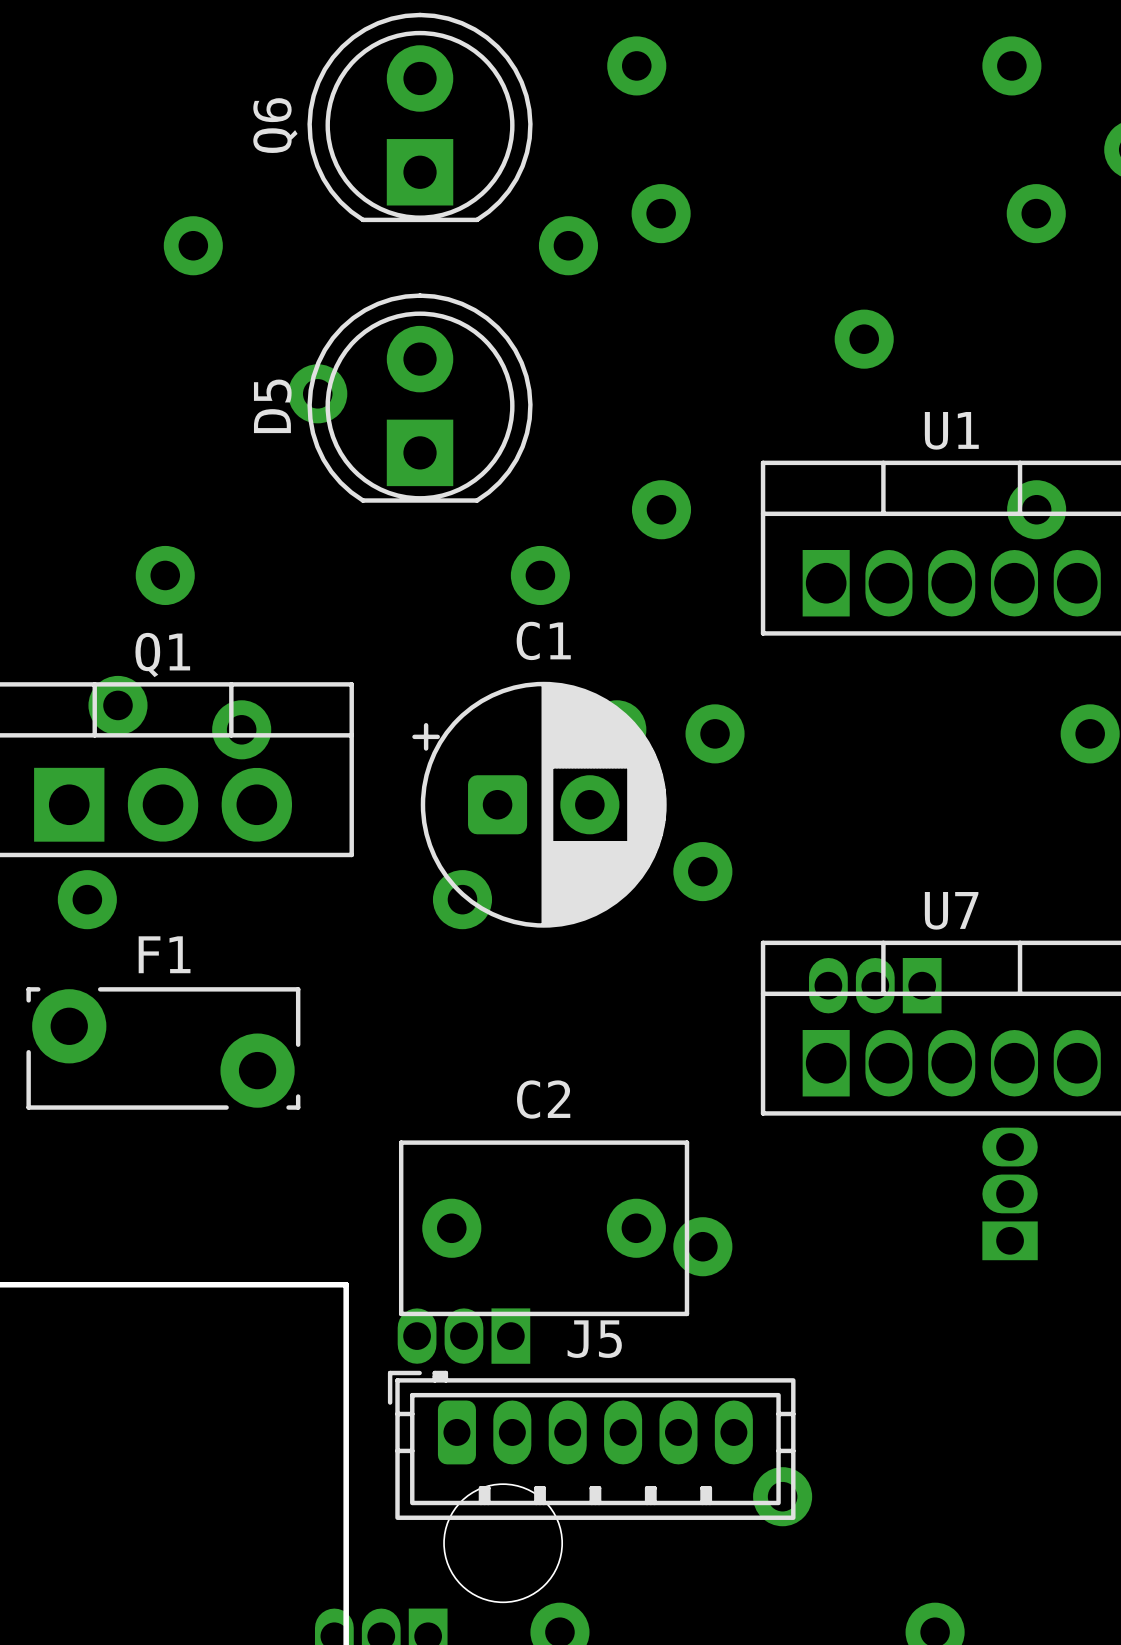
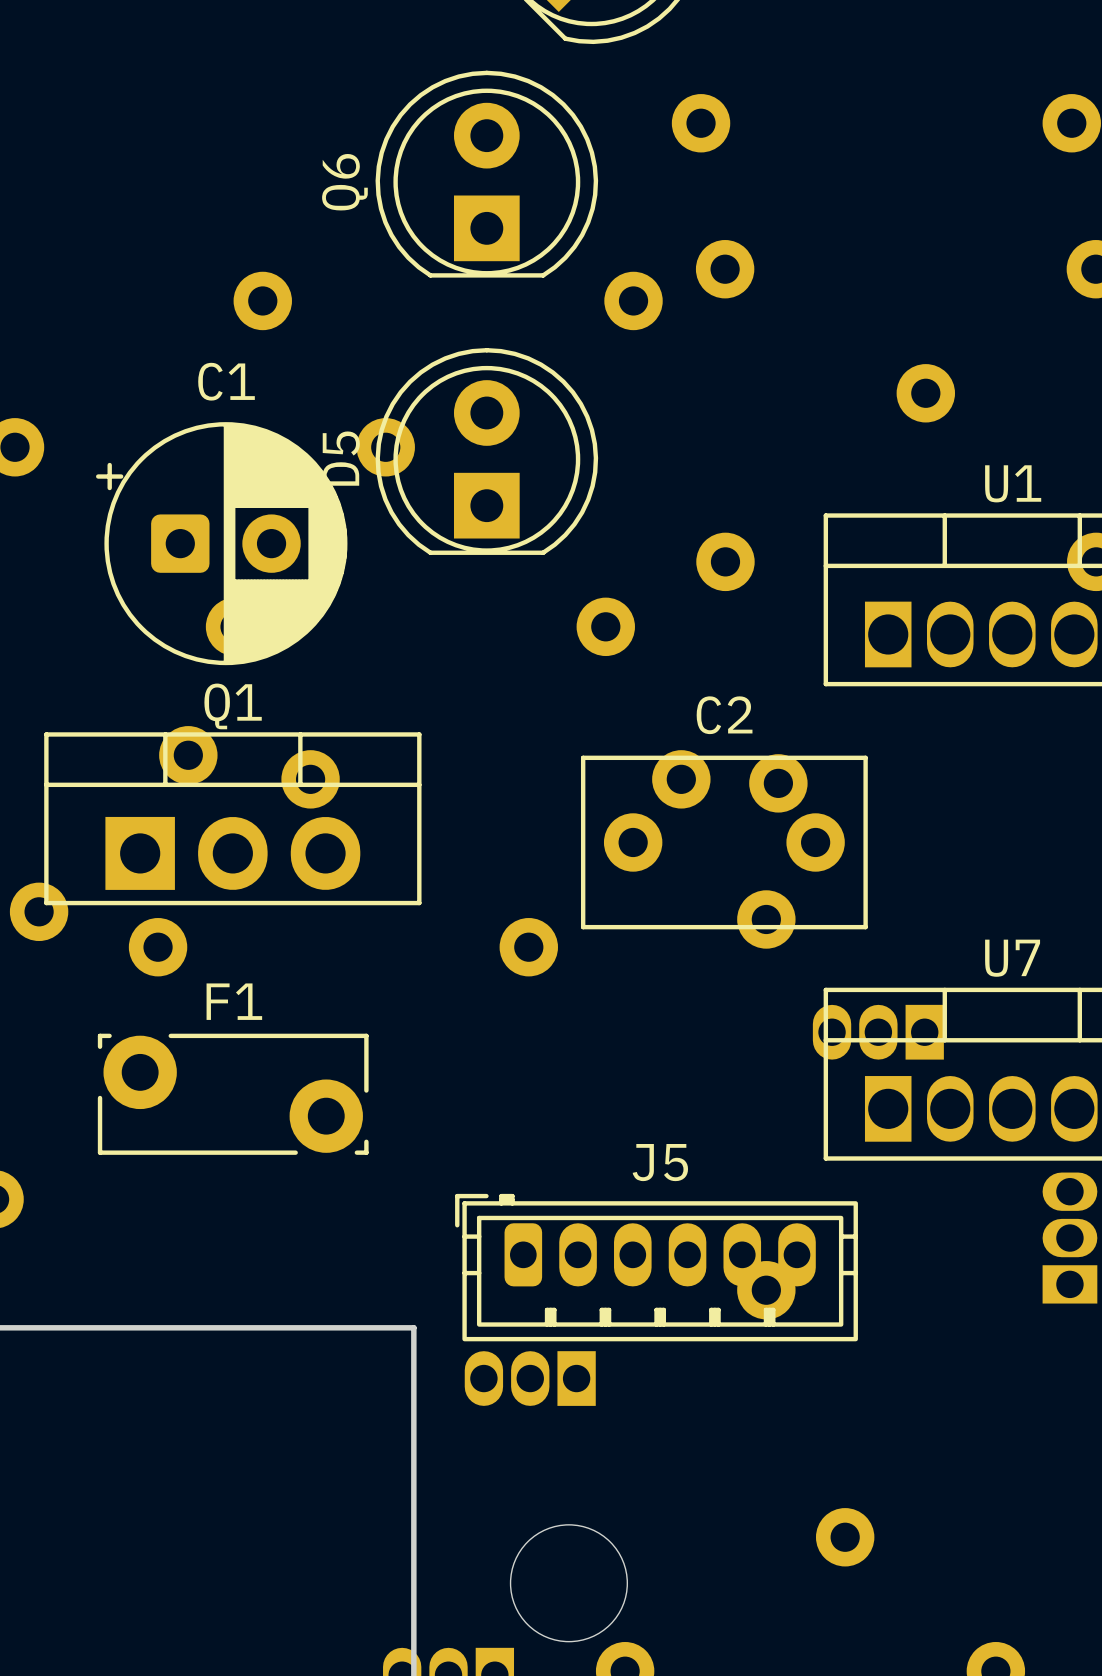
C1 position: (539, 804) -> (221, 543)
part position: (875, 985) -> (878, 1032)
C2 position: (544, 1228) -> (724, 842)
J5 position: (591, 1445) -> (656, 1267)

